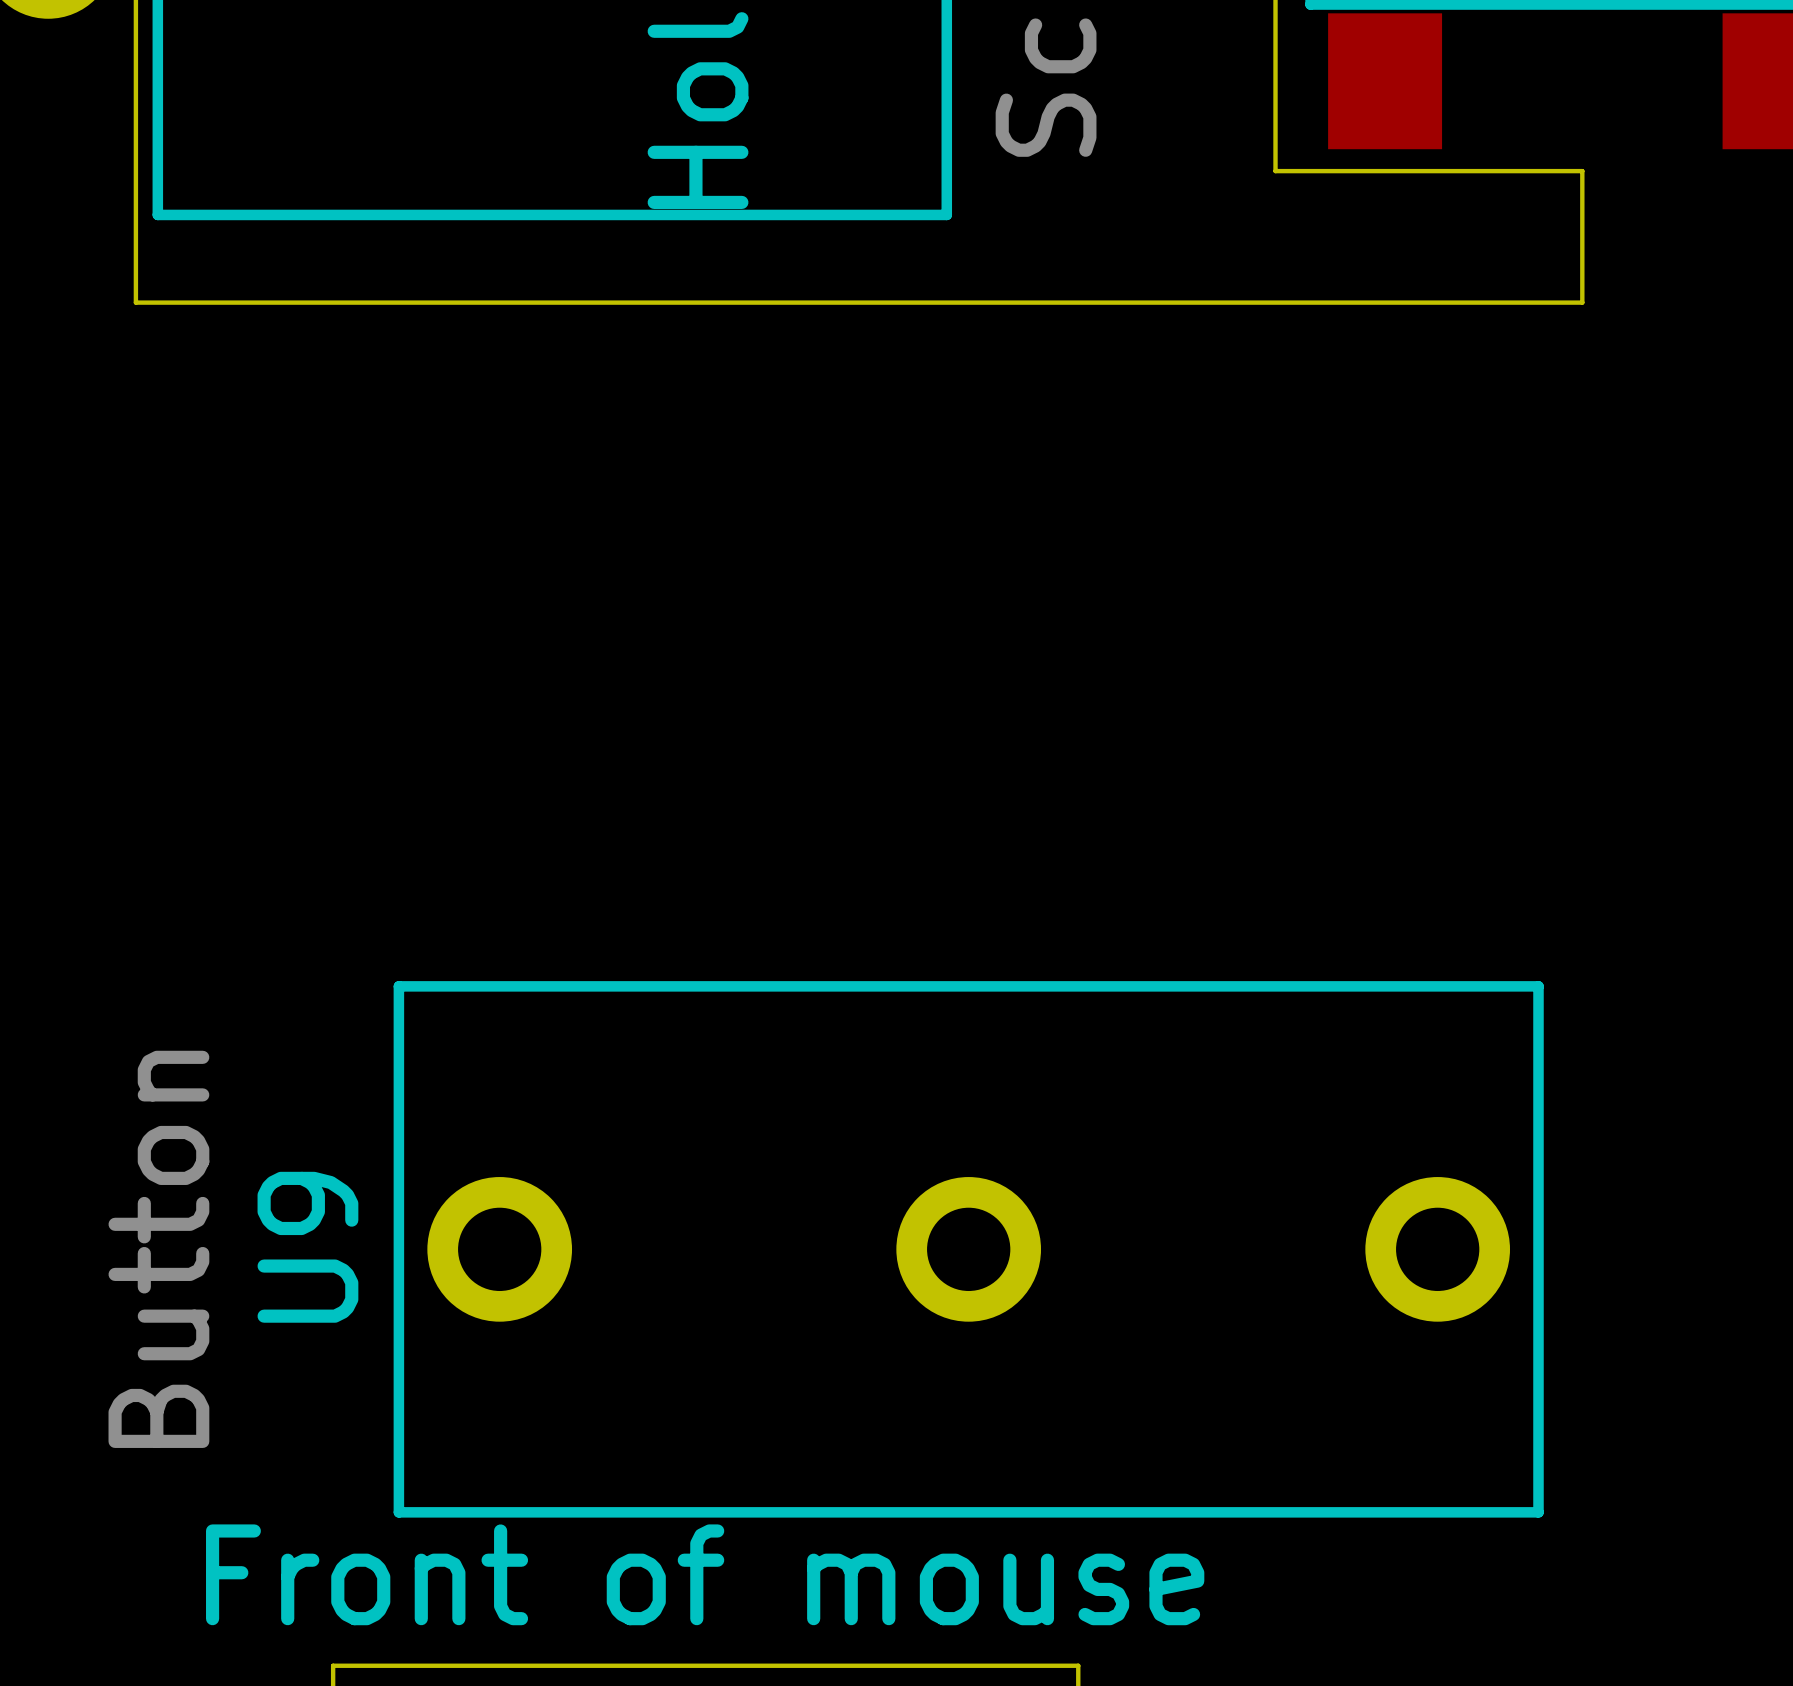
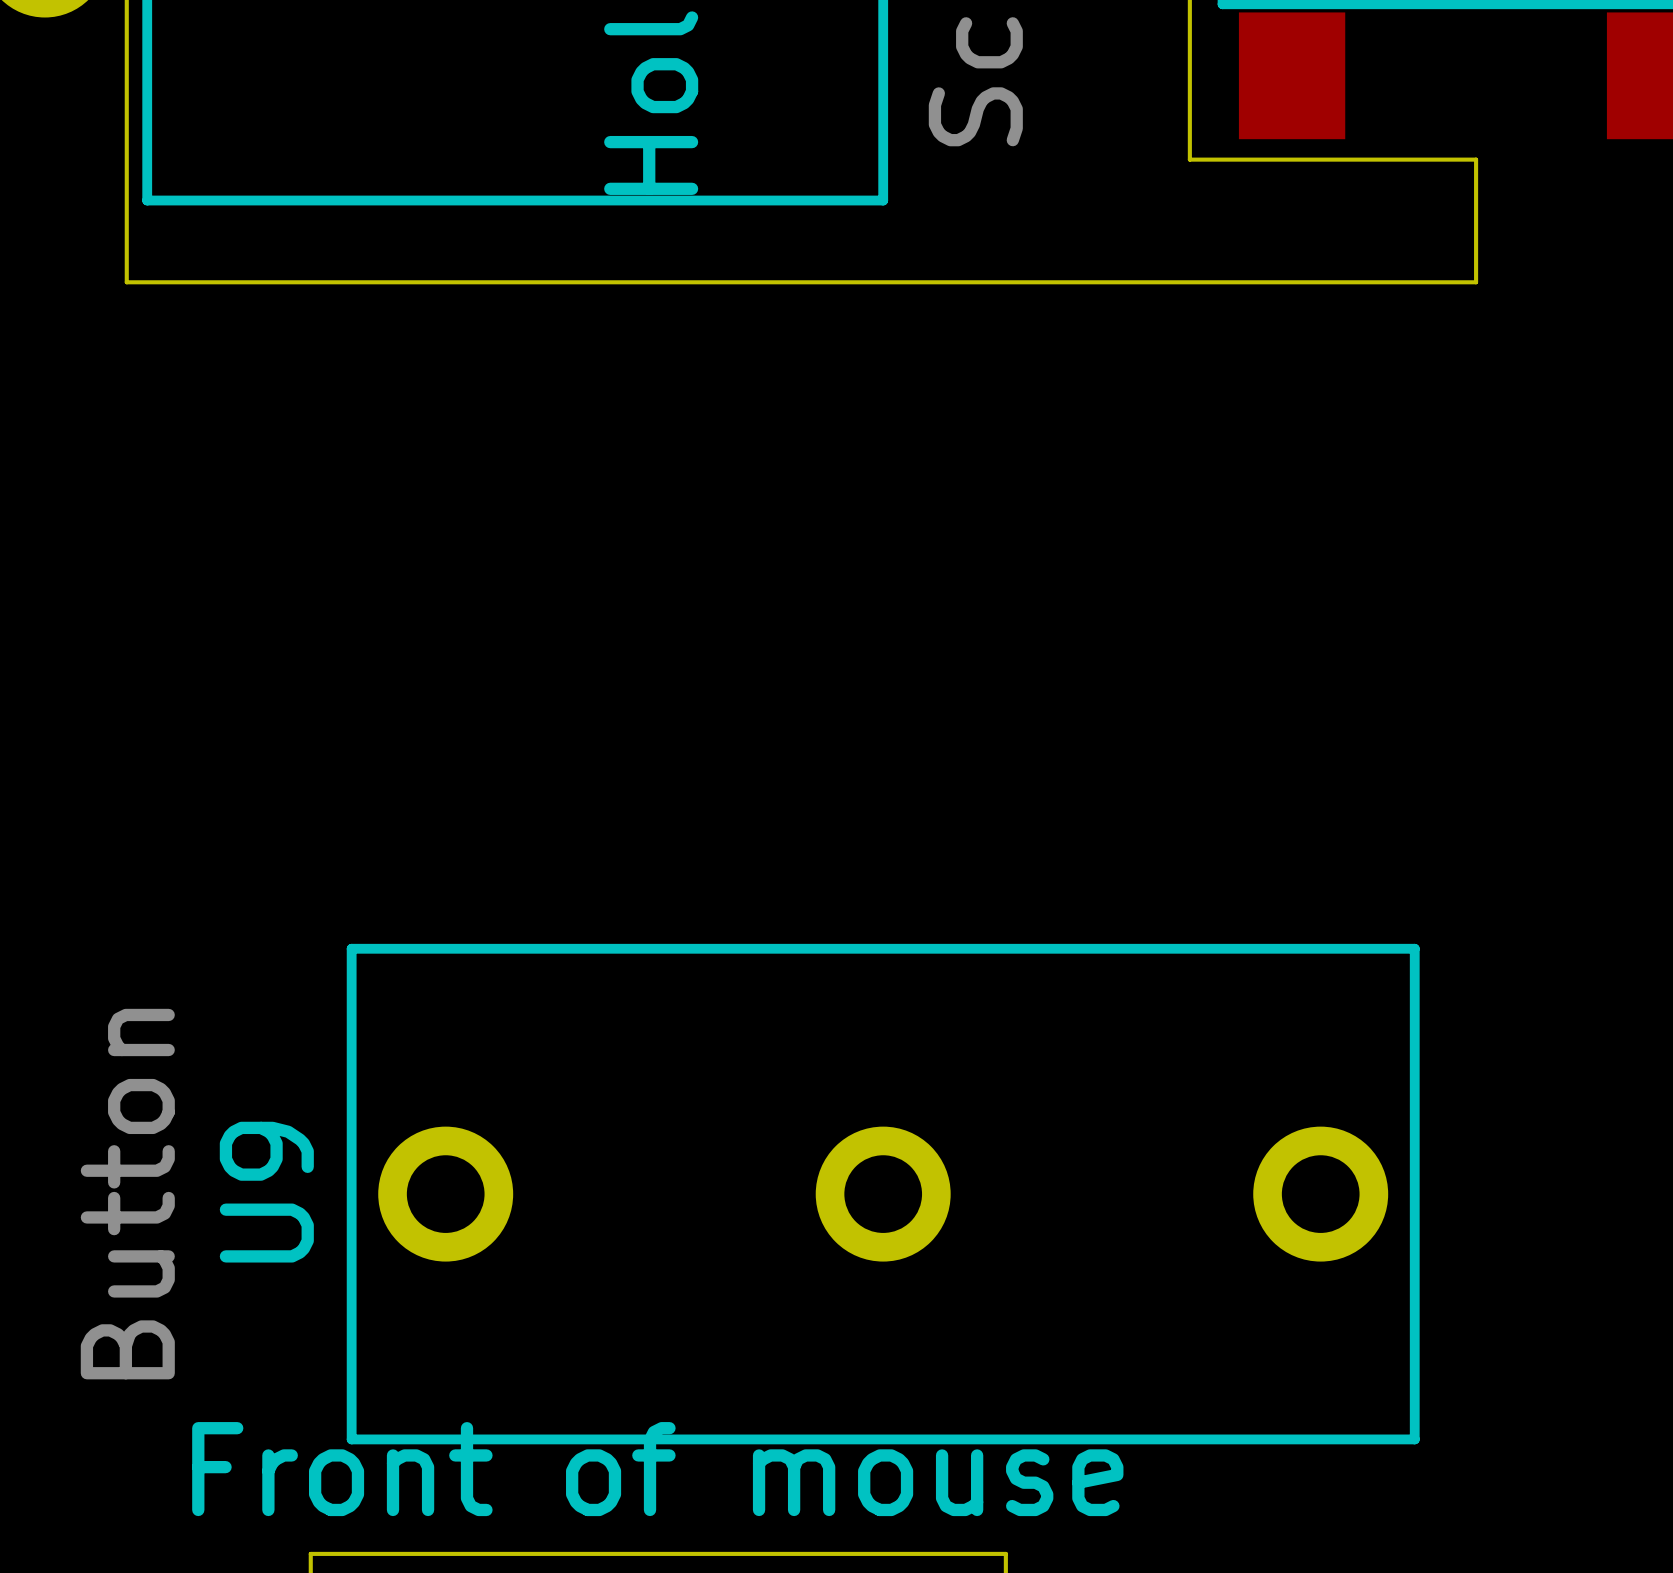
U9 position: (968, 1249) -> (883, 1194)

